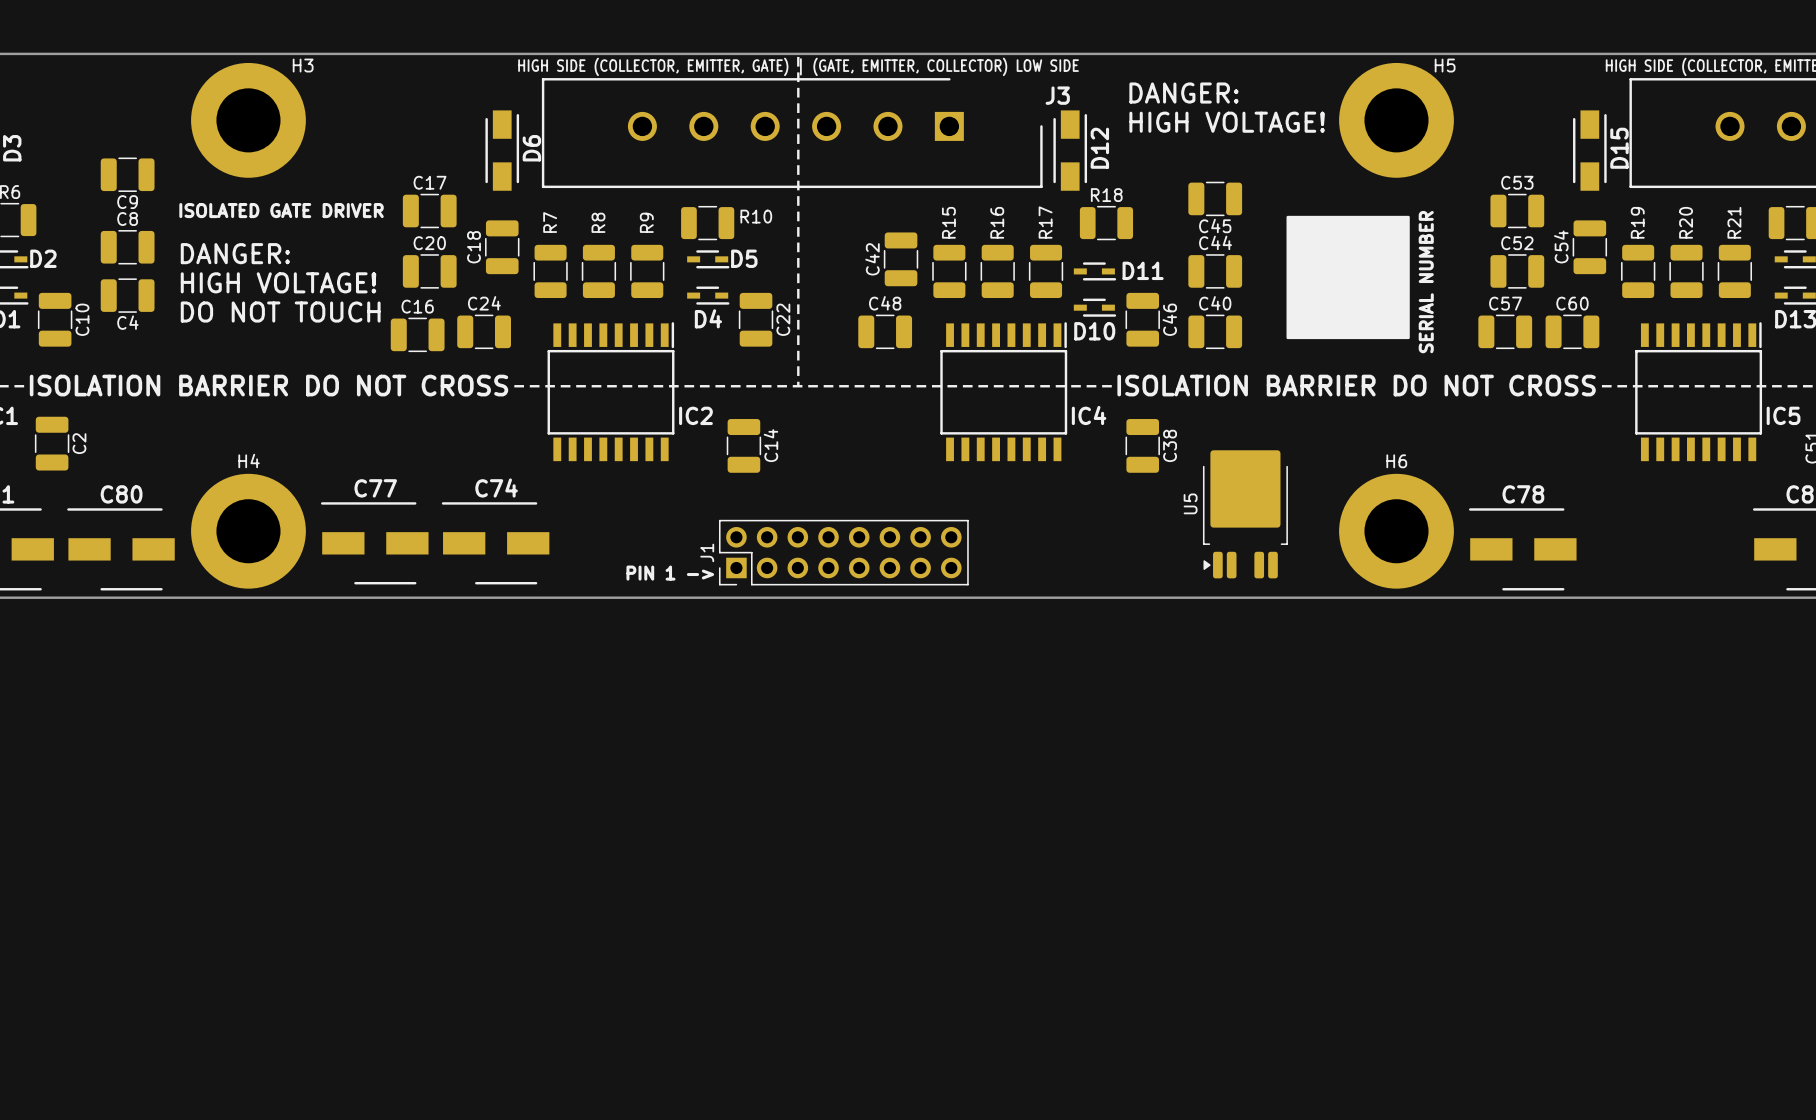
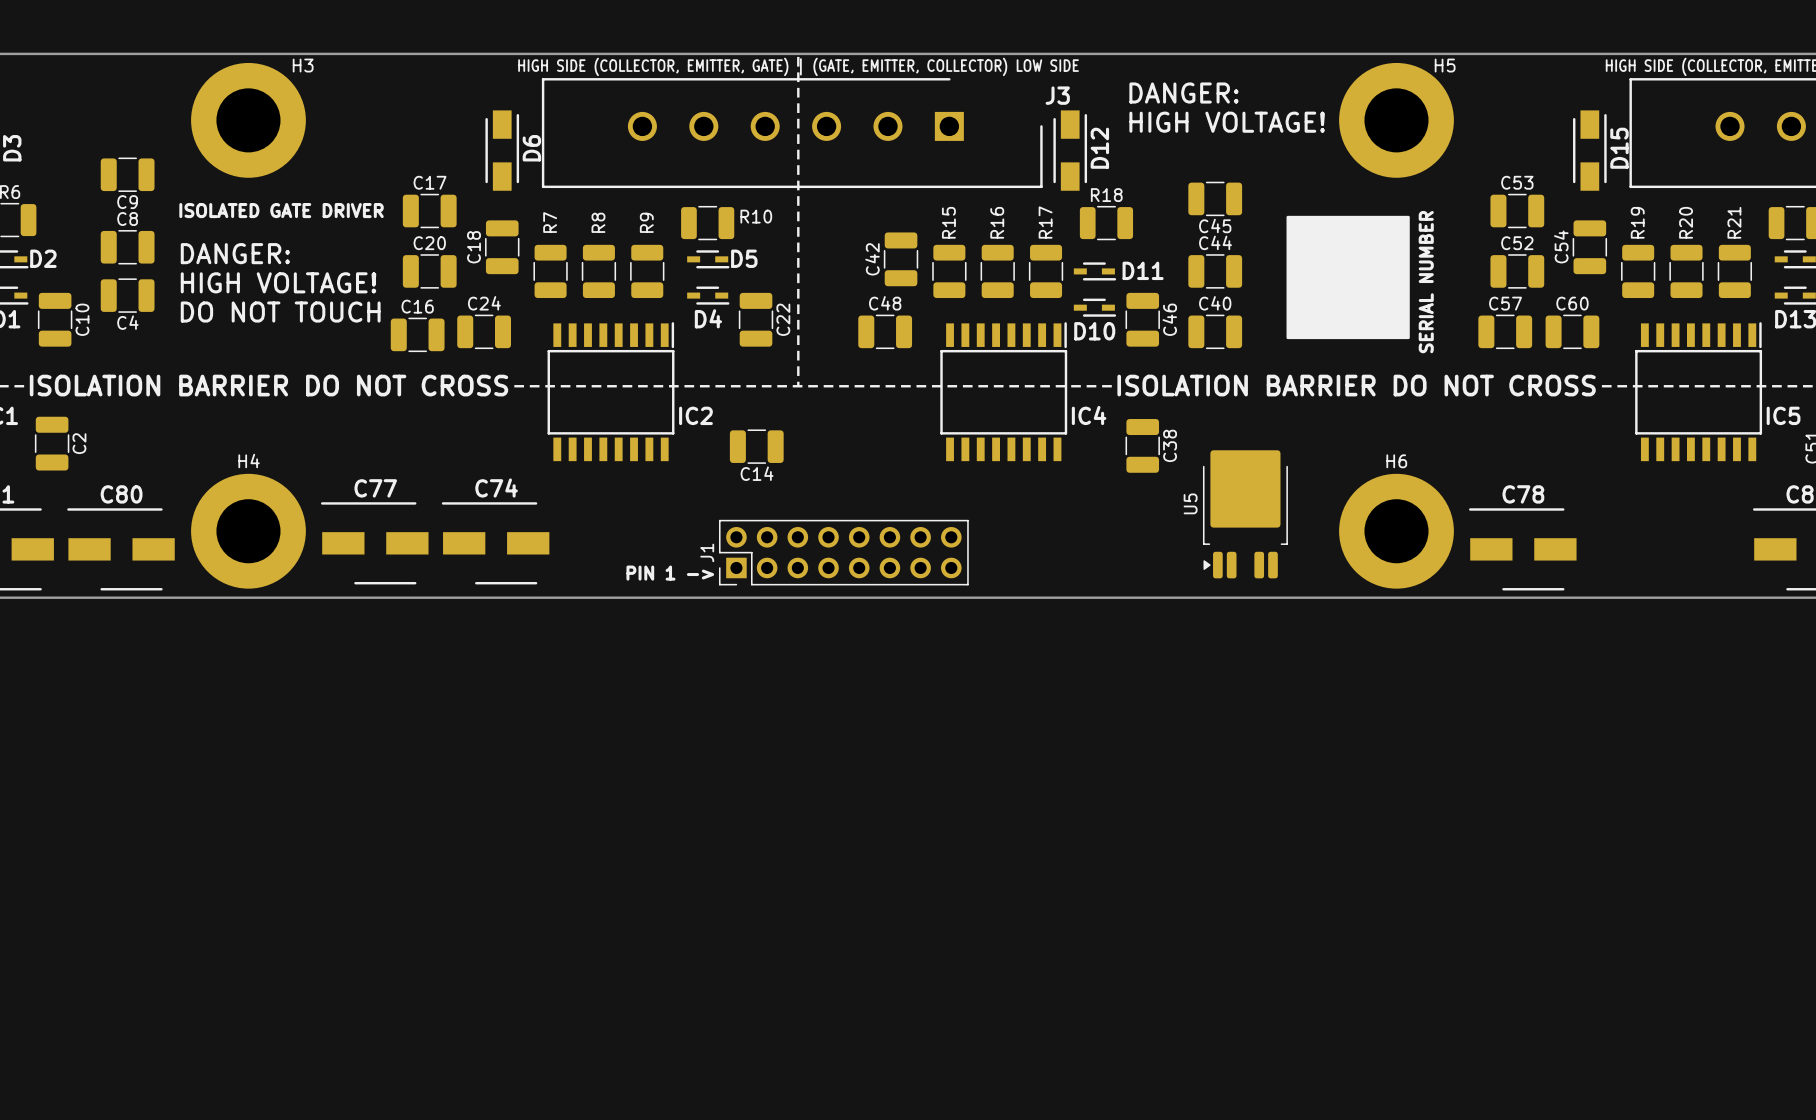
C14 rotation: 0° (743, 445) -> 90° clockwise (756, 446)

